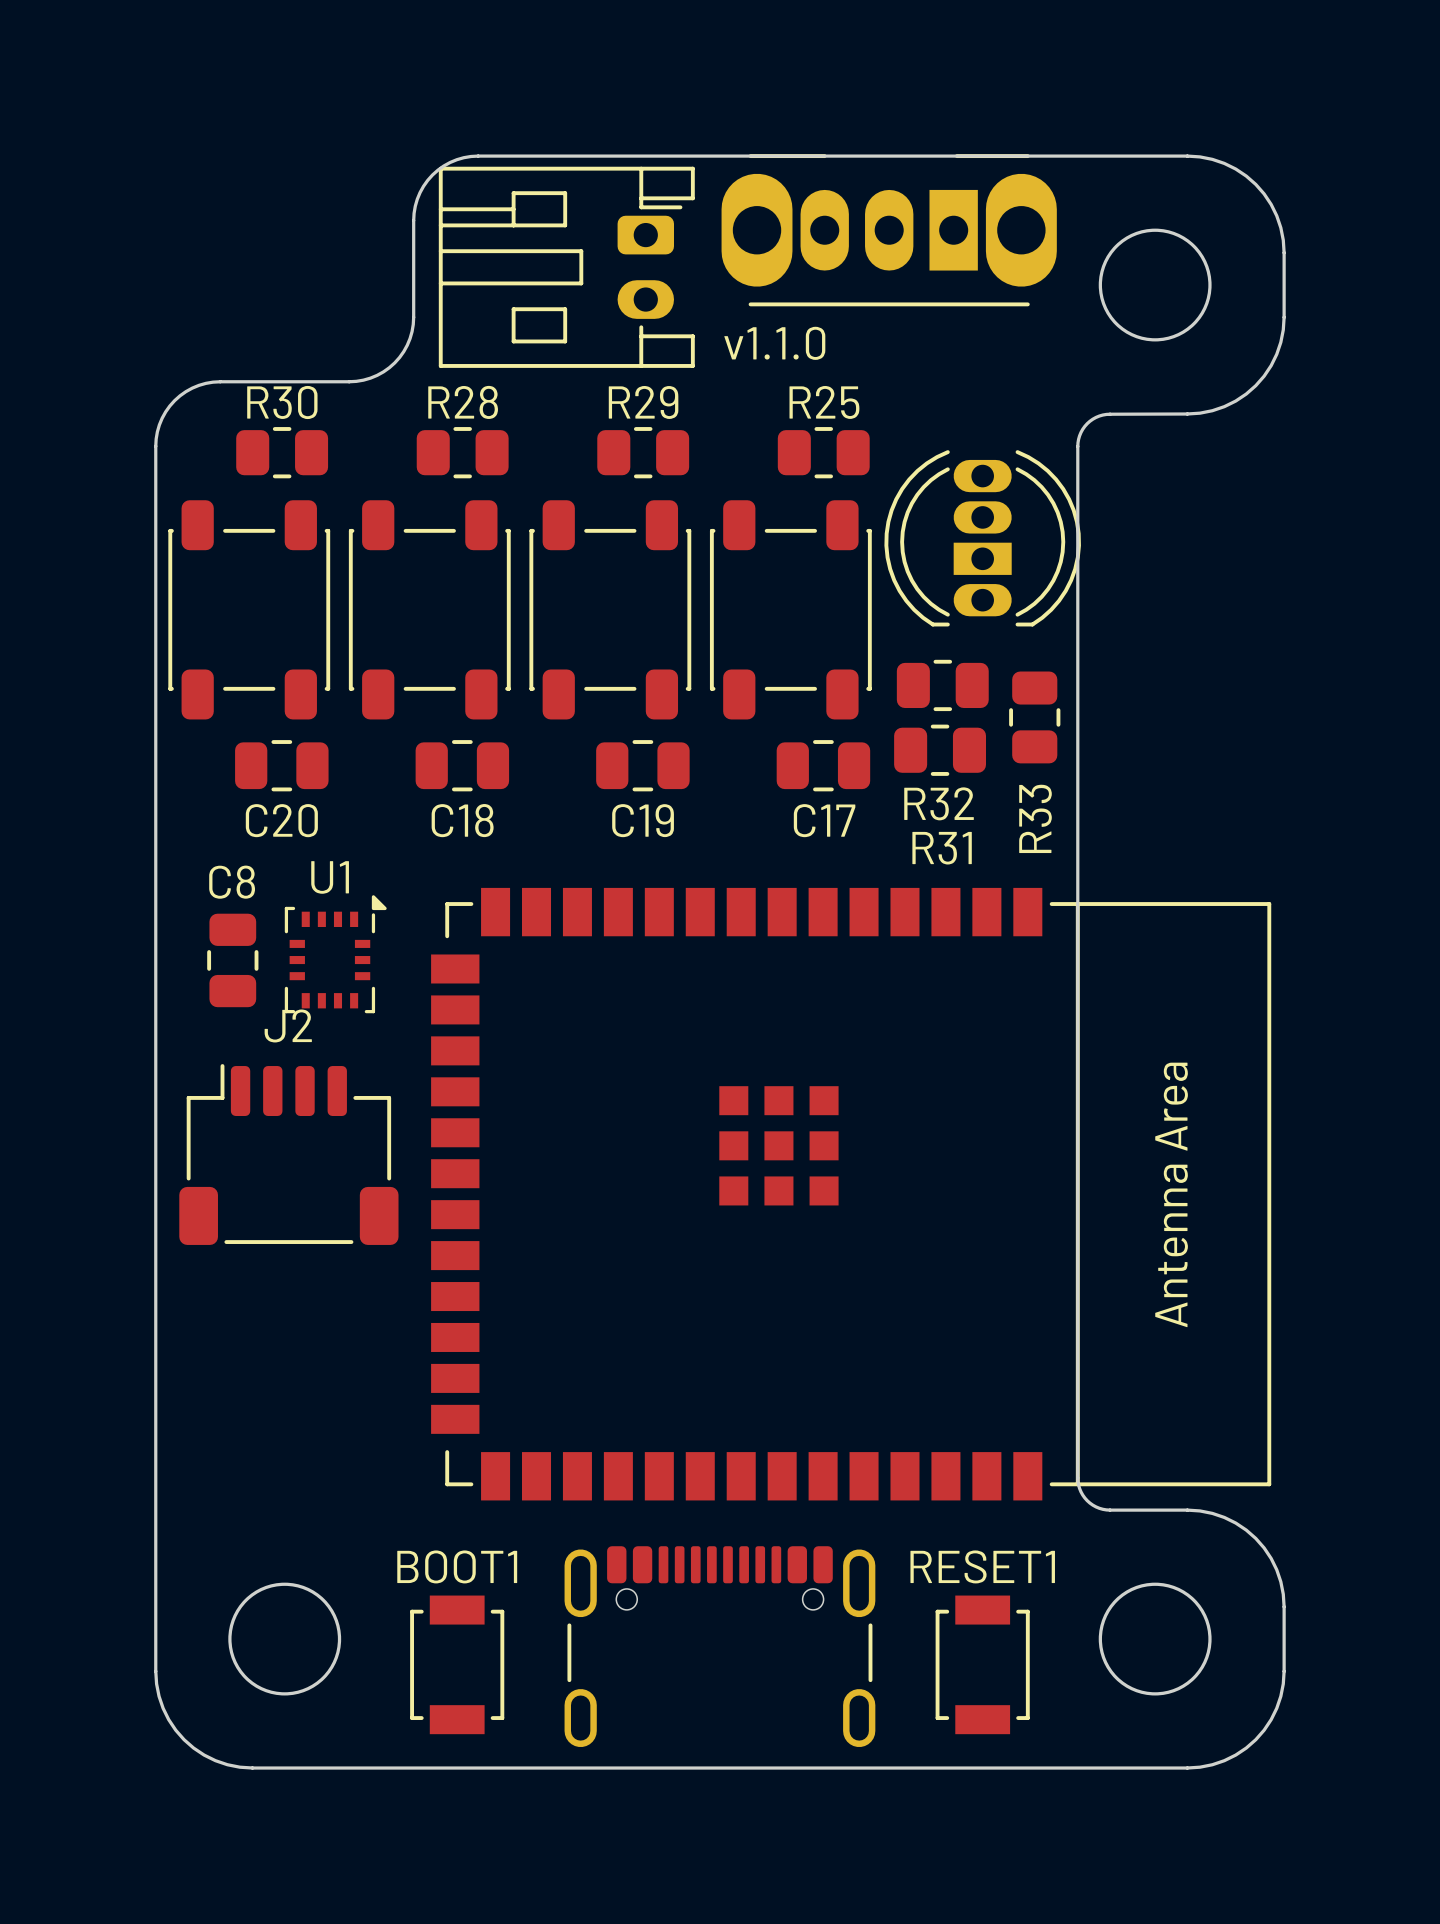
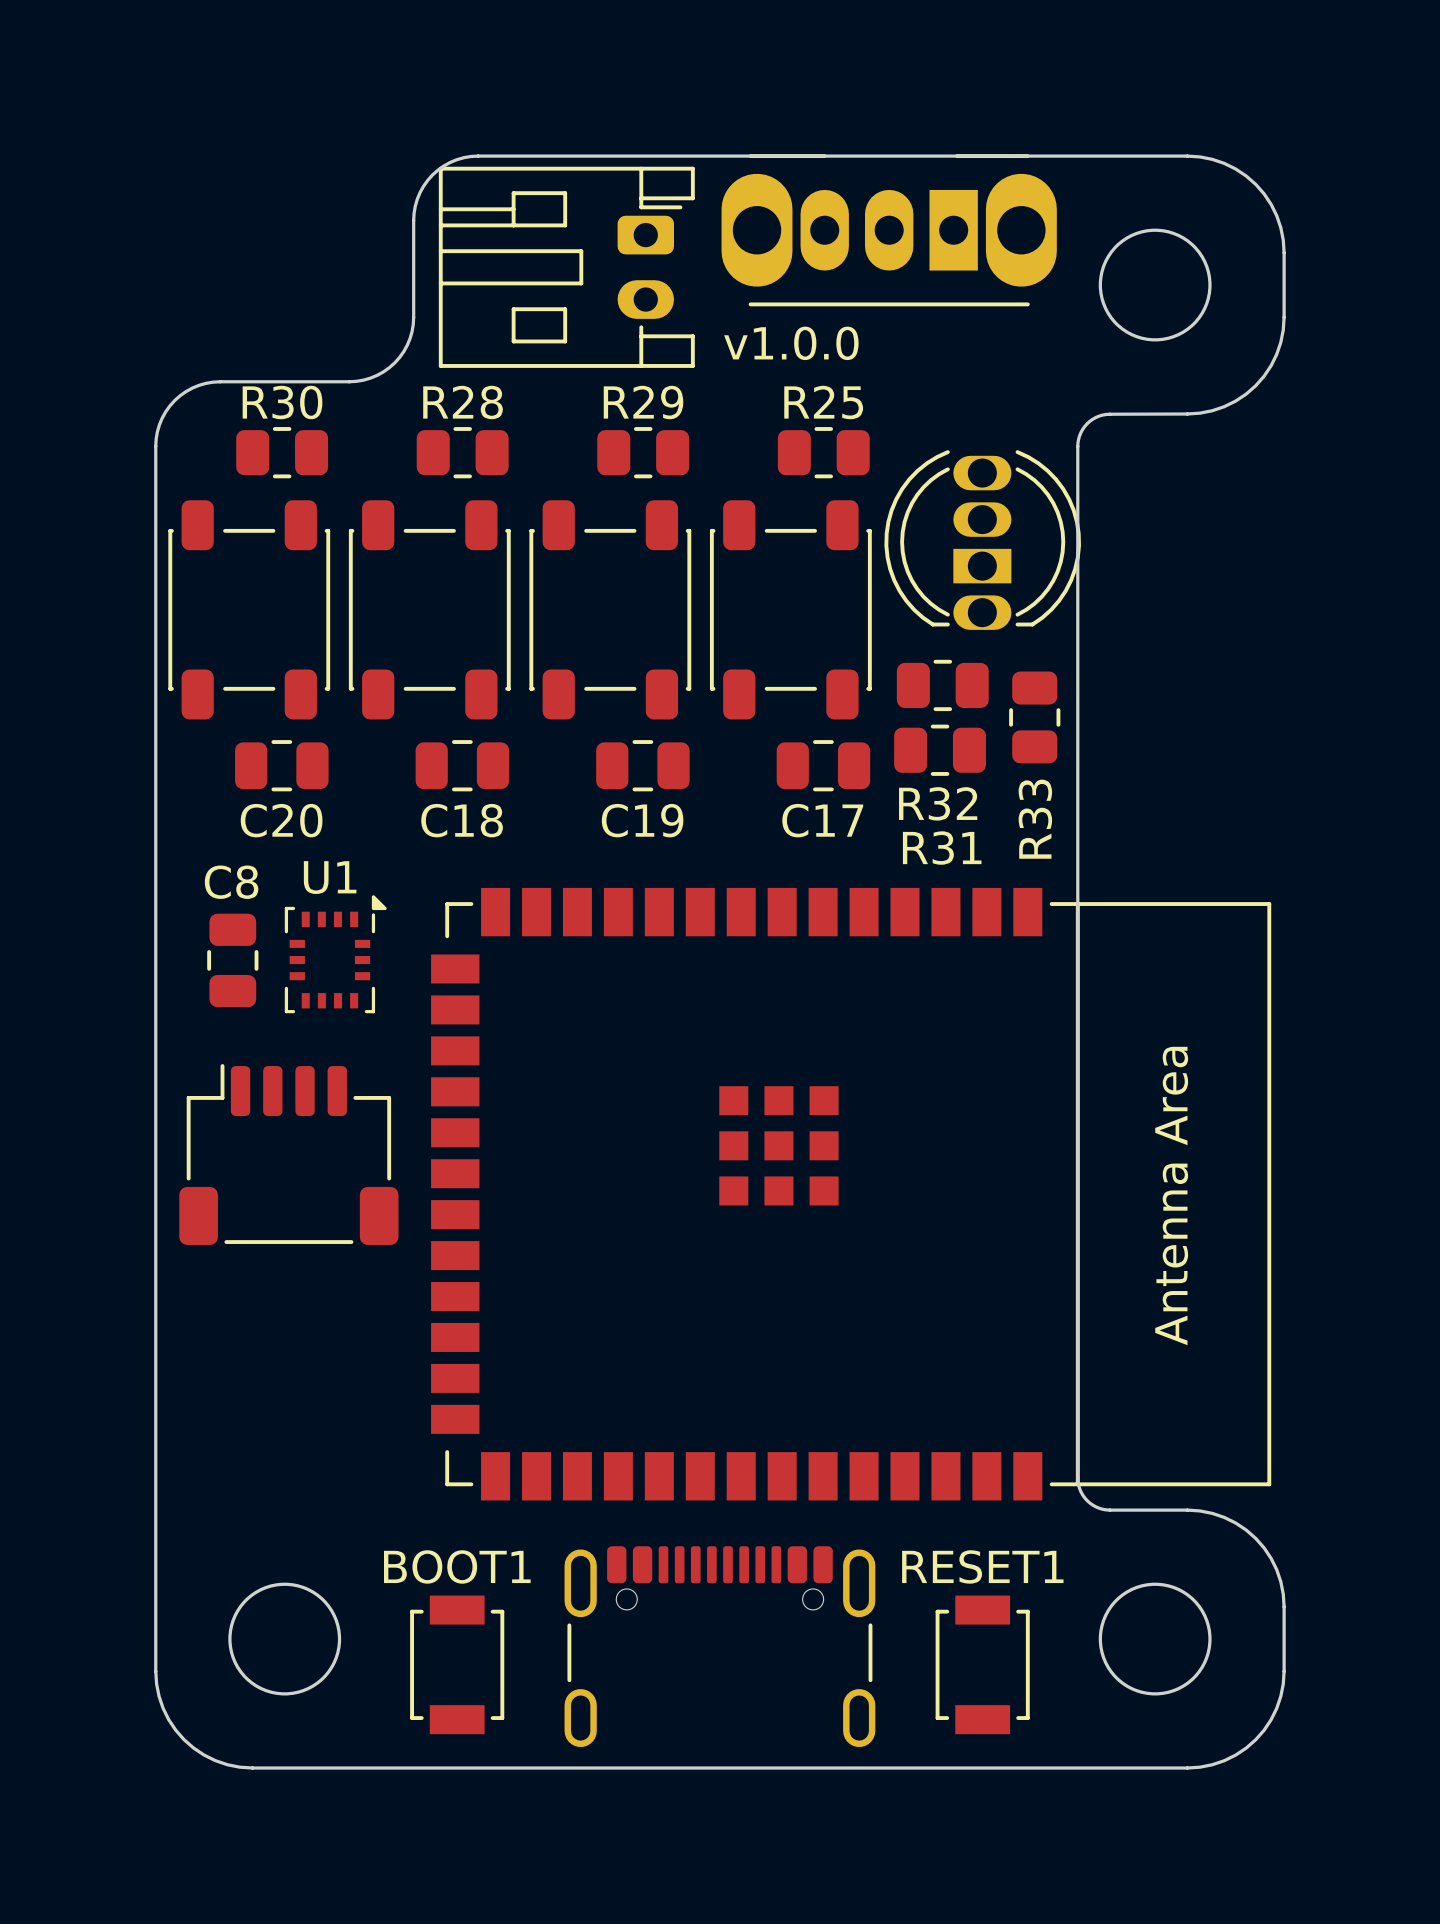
text: v1.1.0 (774, 343) -> v1.0.0 (791, 343)
part footprint: [884, 450, 1081, 627] -> [884, 450, 1081, 630]
J2 name: J2 (288, 1025) -> none

